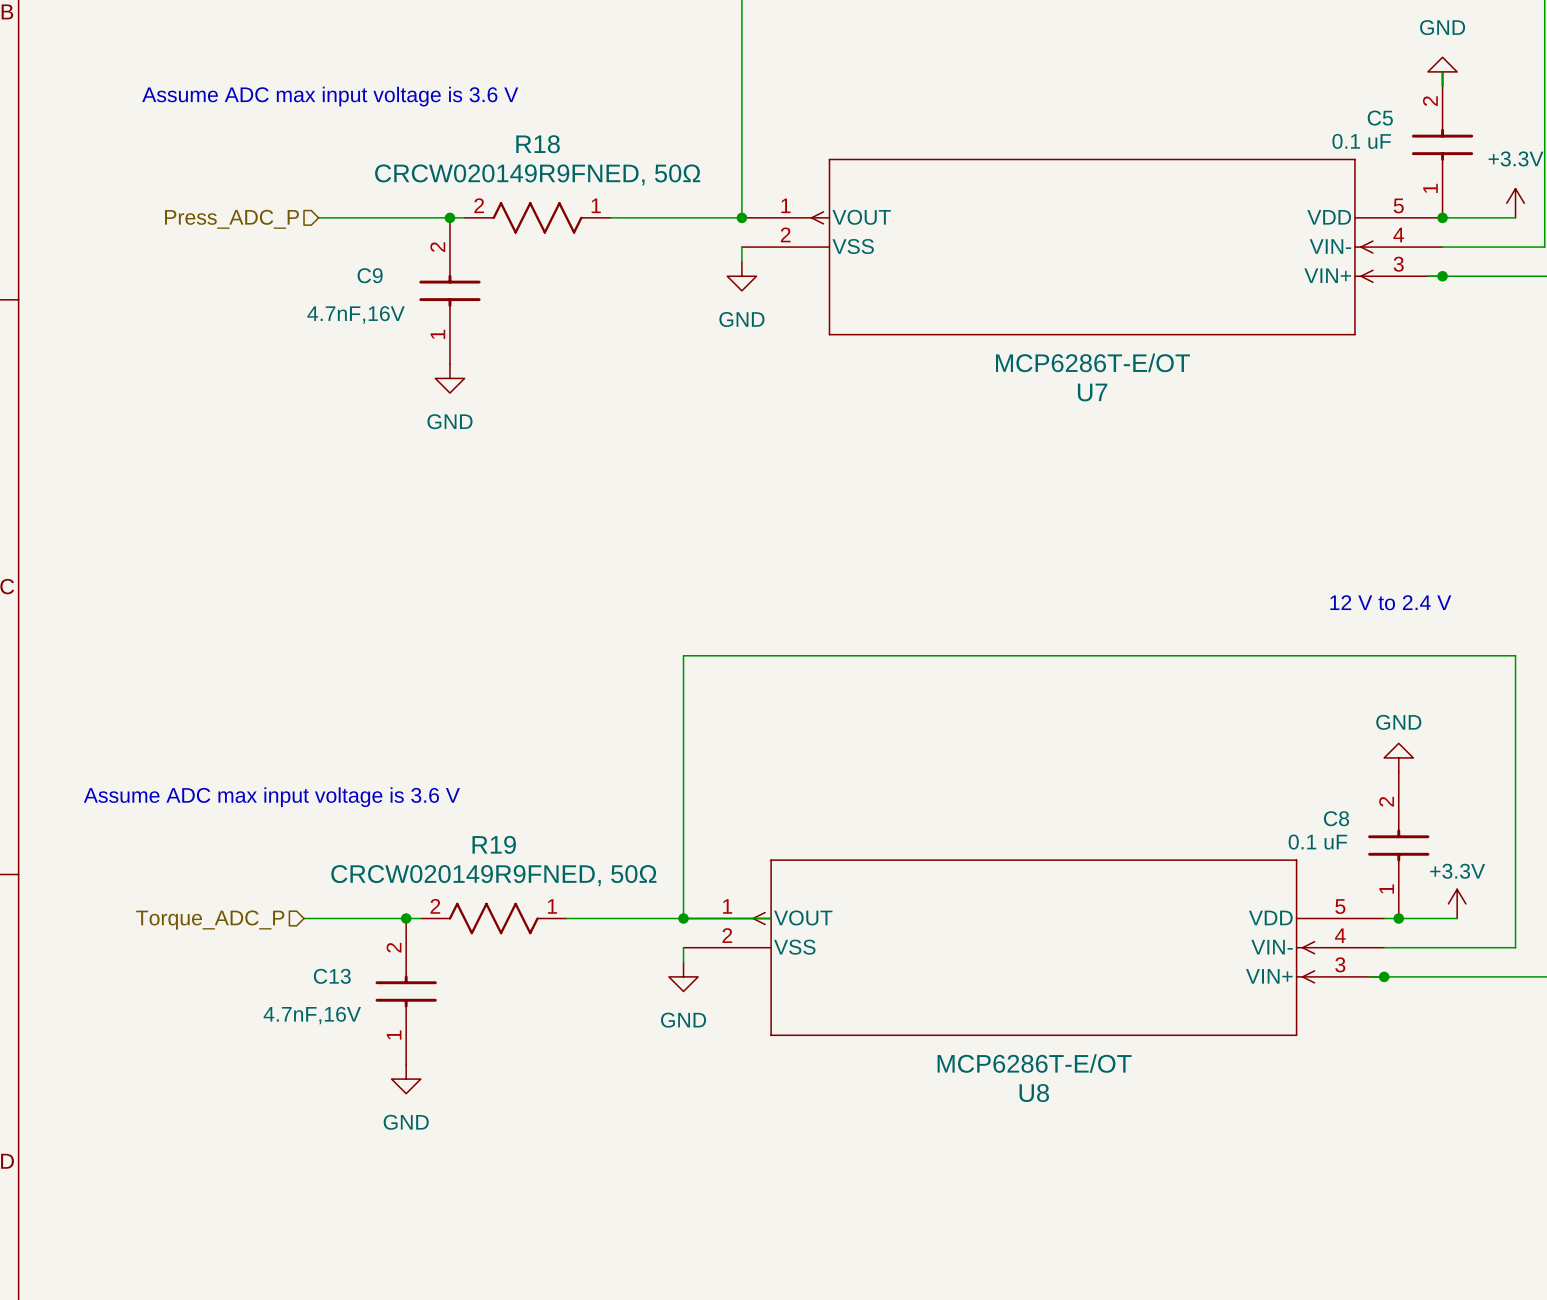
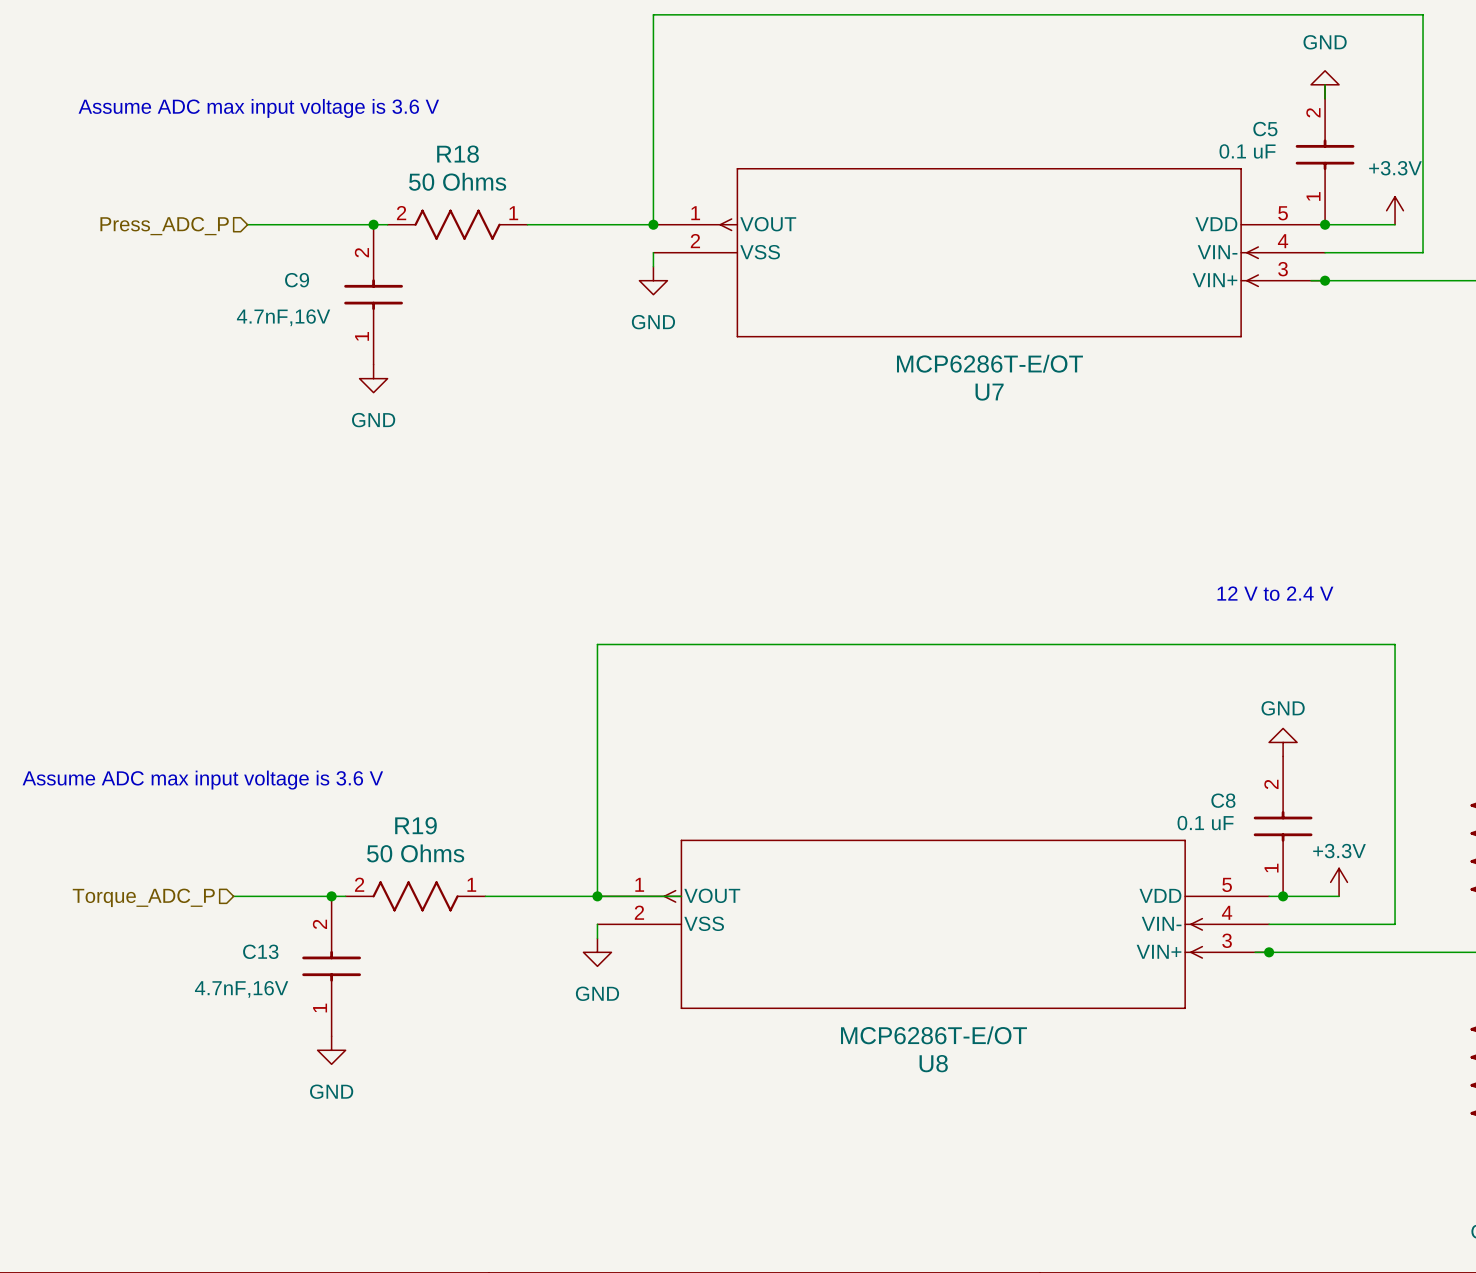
R18 value: CRCW020149R9FNED, 50Ω (537, 174) -> 50 Ohms (457, 181)
R19 value: CRCW020149R9FNED, 50Ω (493, 875) -> 50 Ohms (415, 853)

